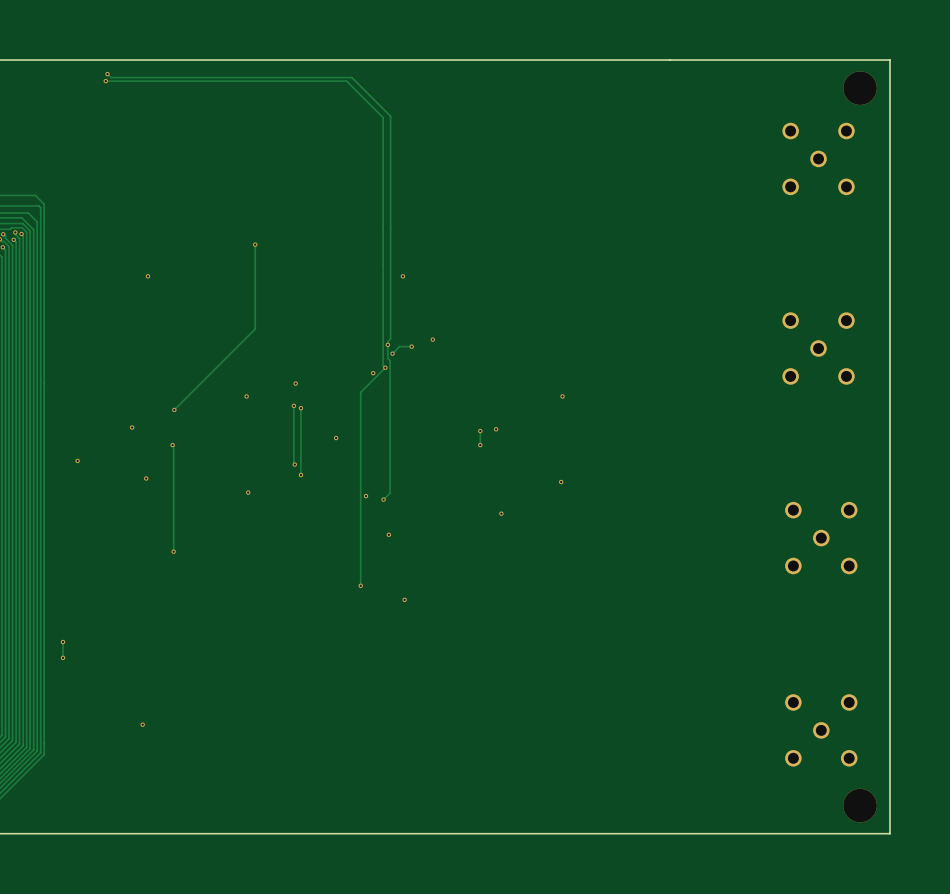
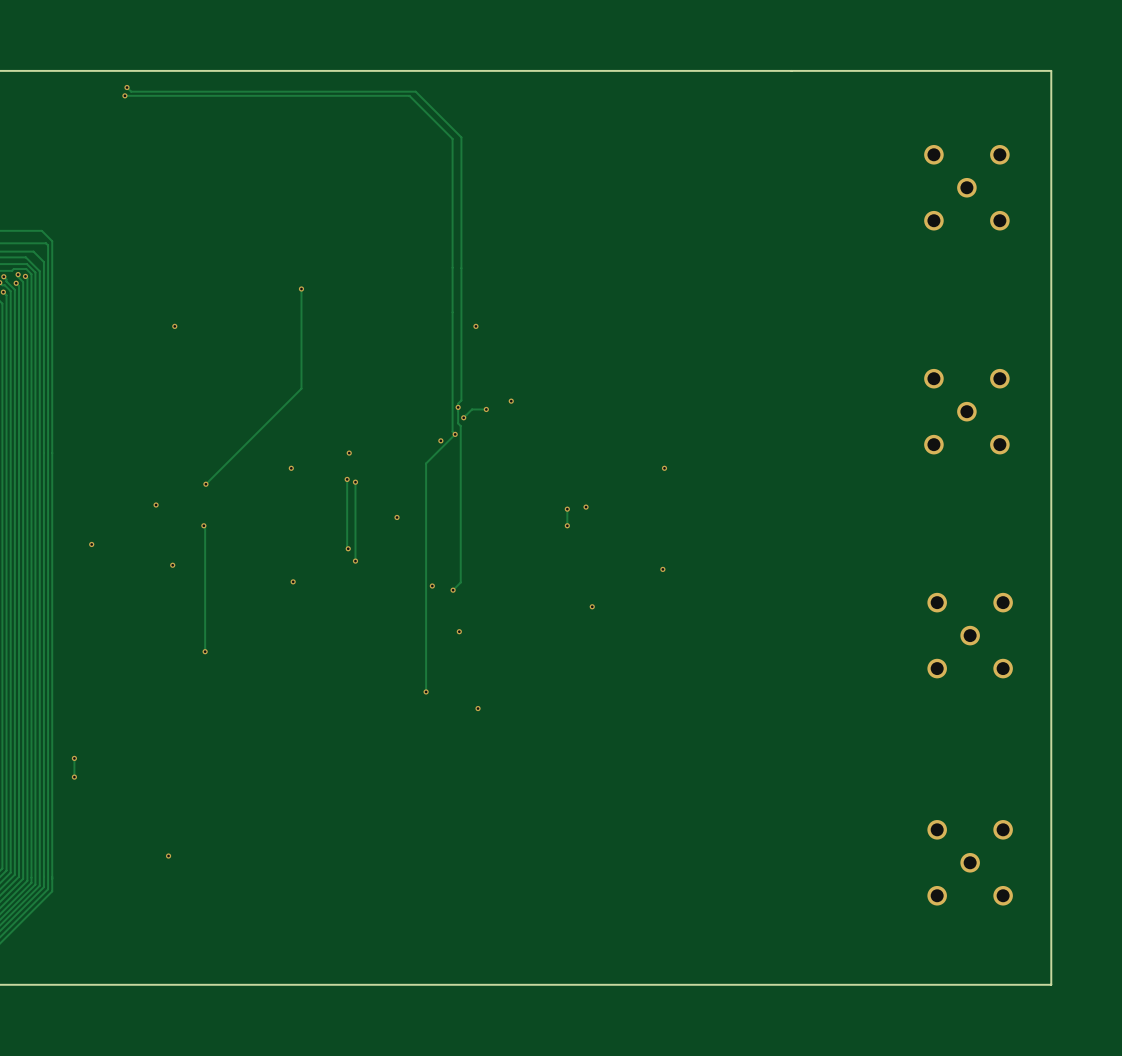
part: (860, 88) -> none
part: (860, 805) -> none

